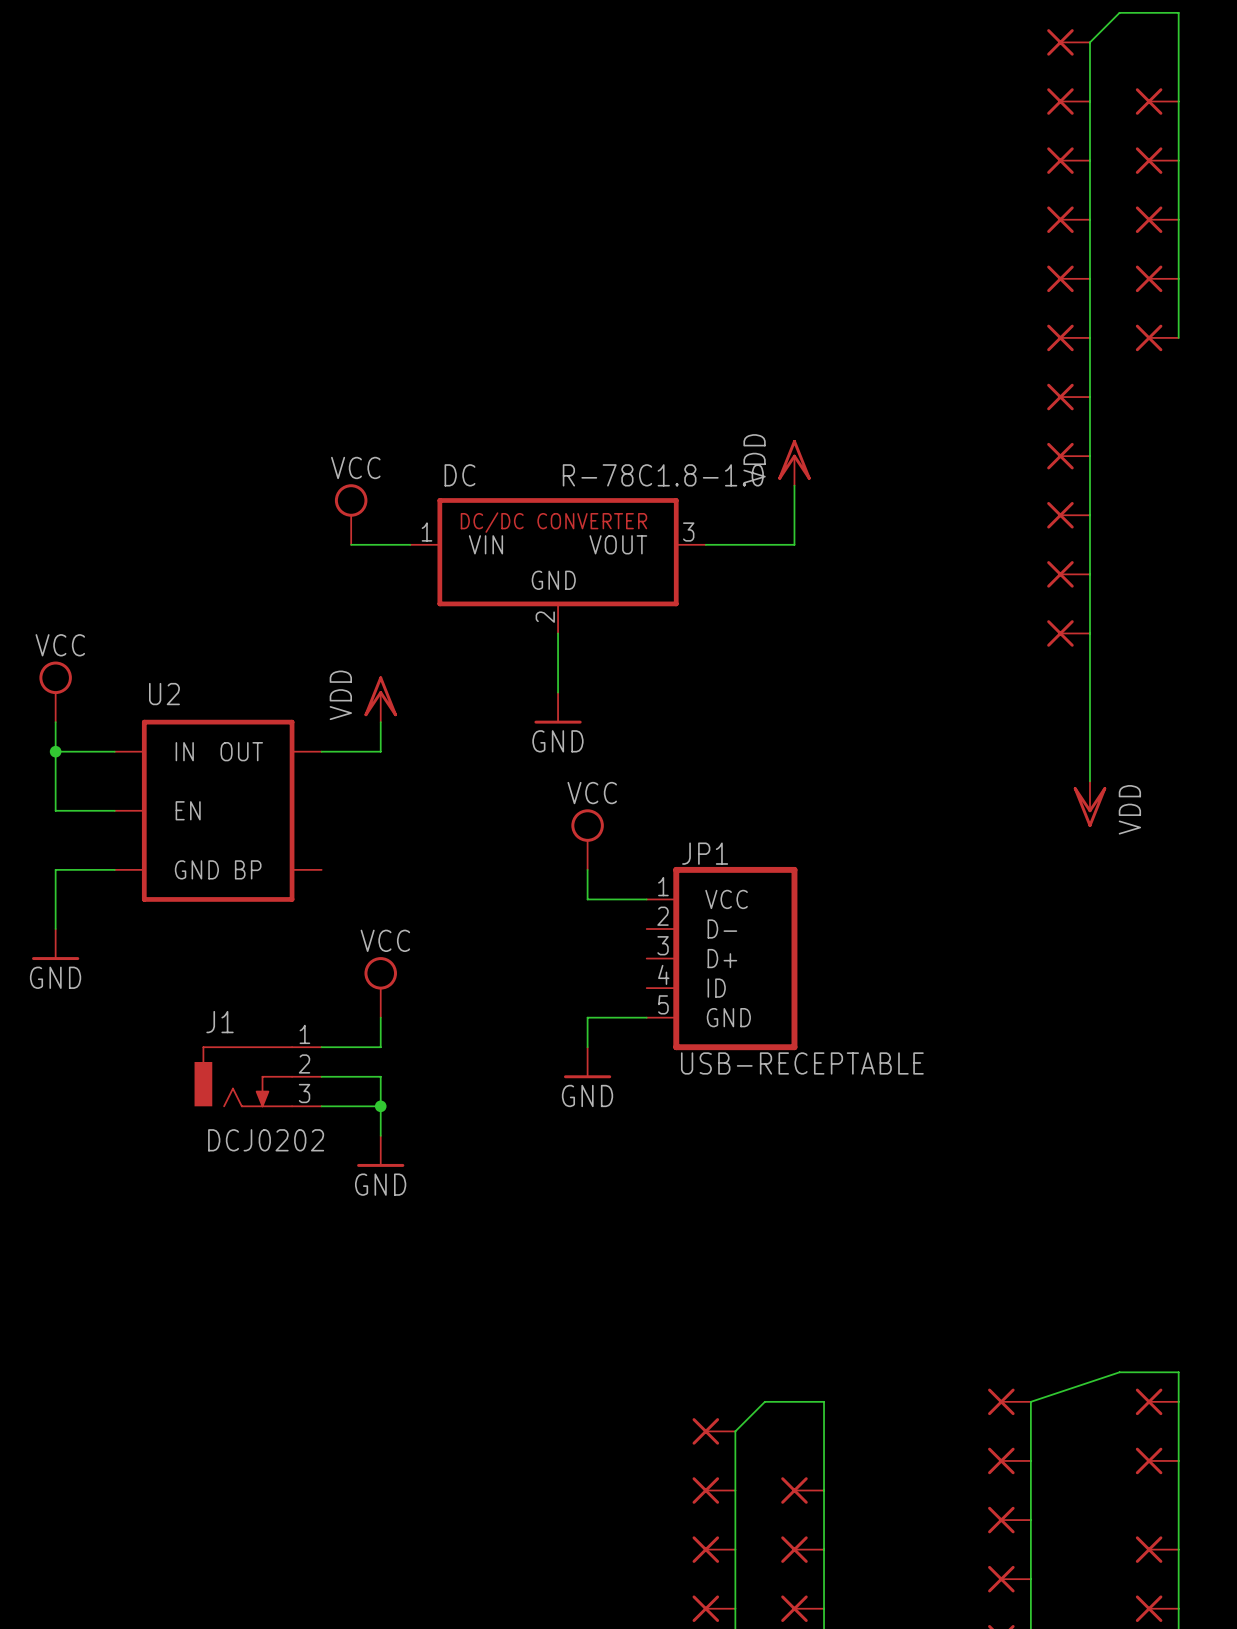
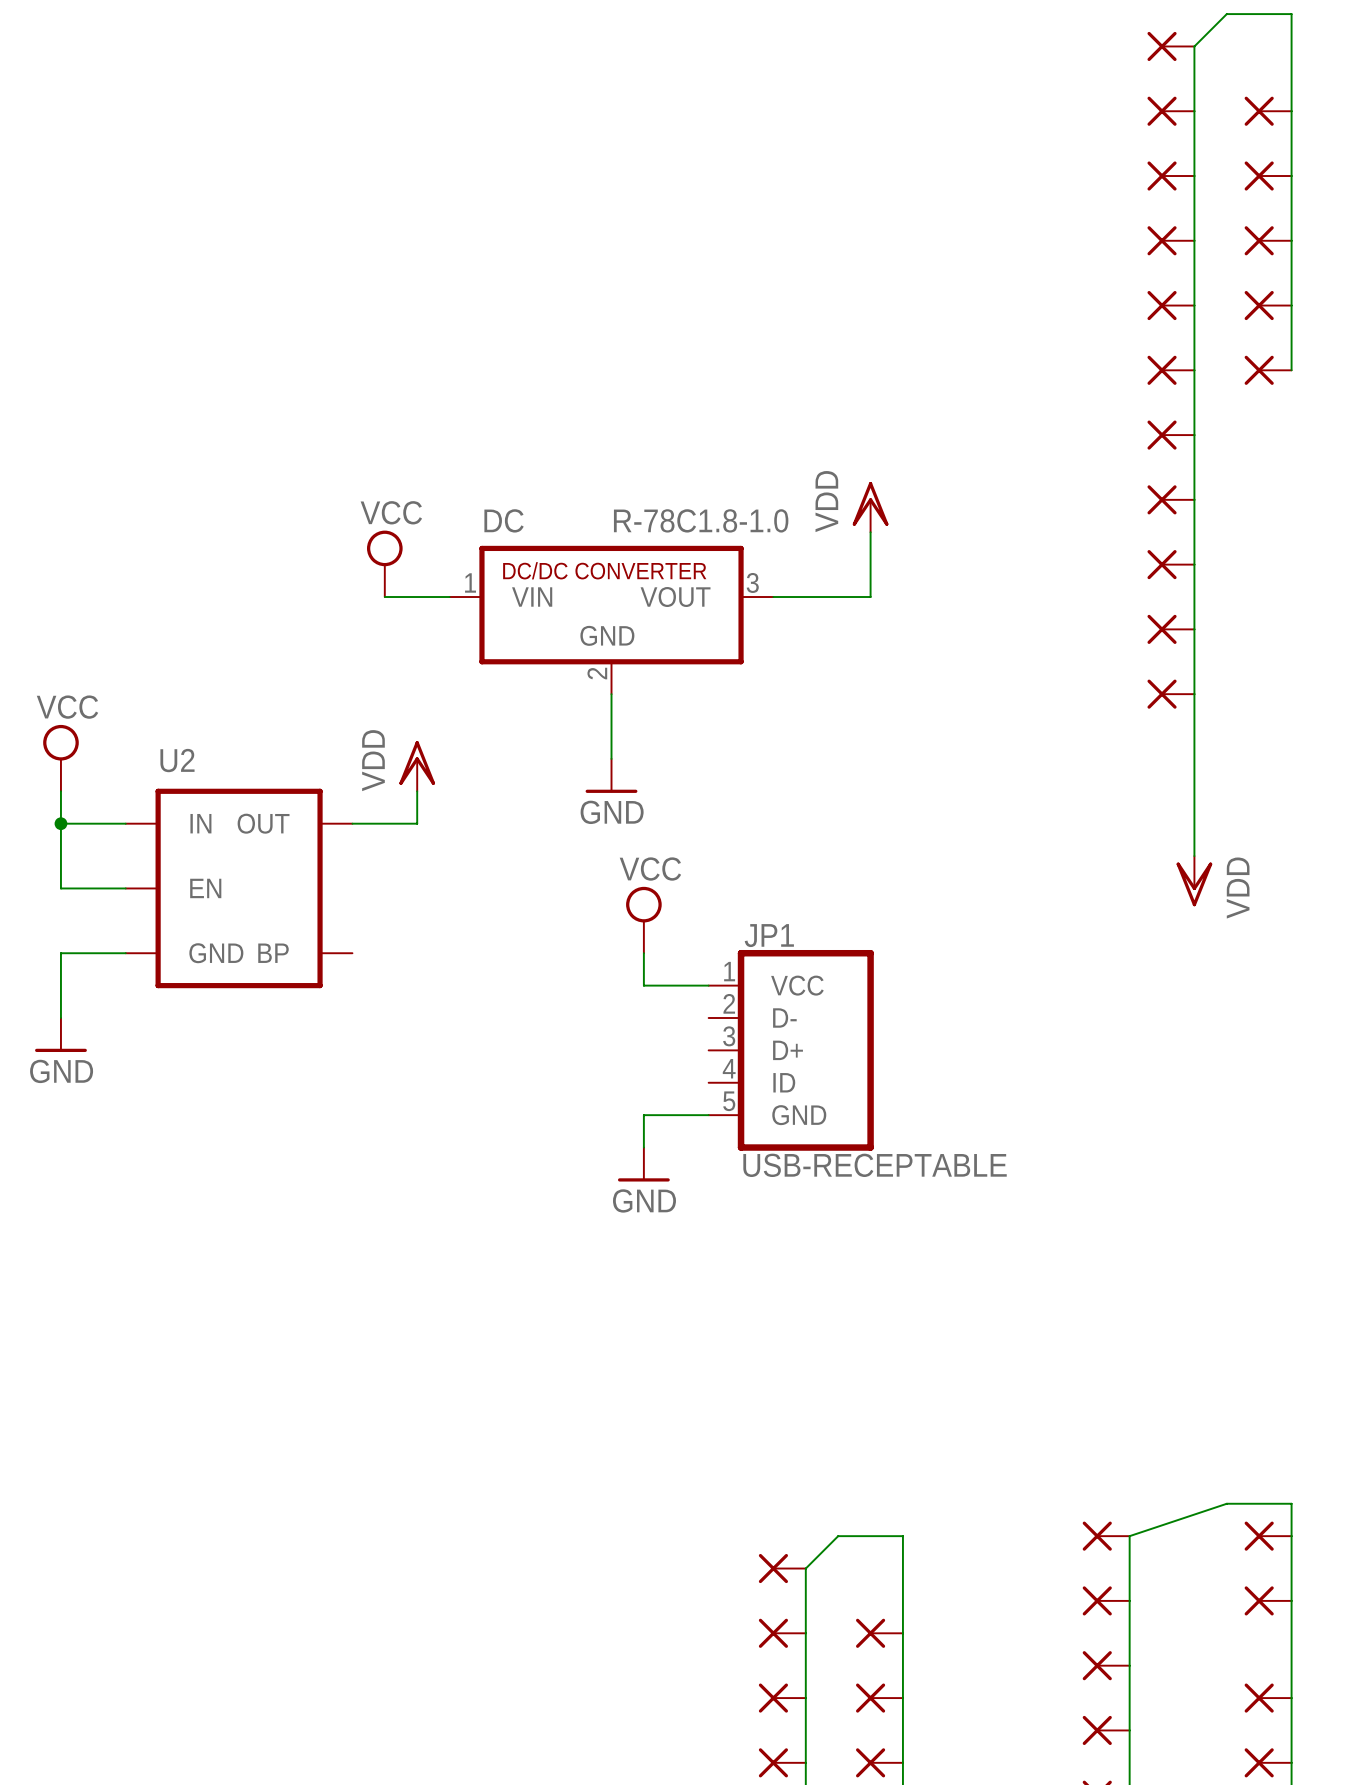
power symbol: VCC (380, 987) -> none
wire: (380, 1017) (380, 1047) (321, 1047) -> none
J1: DCJ0202 (258, 1076) -> none
wire: (321, 1076) (380, 1076) (380, 1135) -> none
wire: (321, 1106) (380, 1106) -> none
junction: (380, 1106) -> none
power symbol: GND (380, 1151) -> none

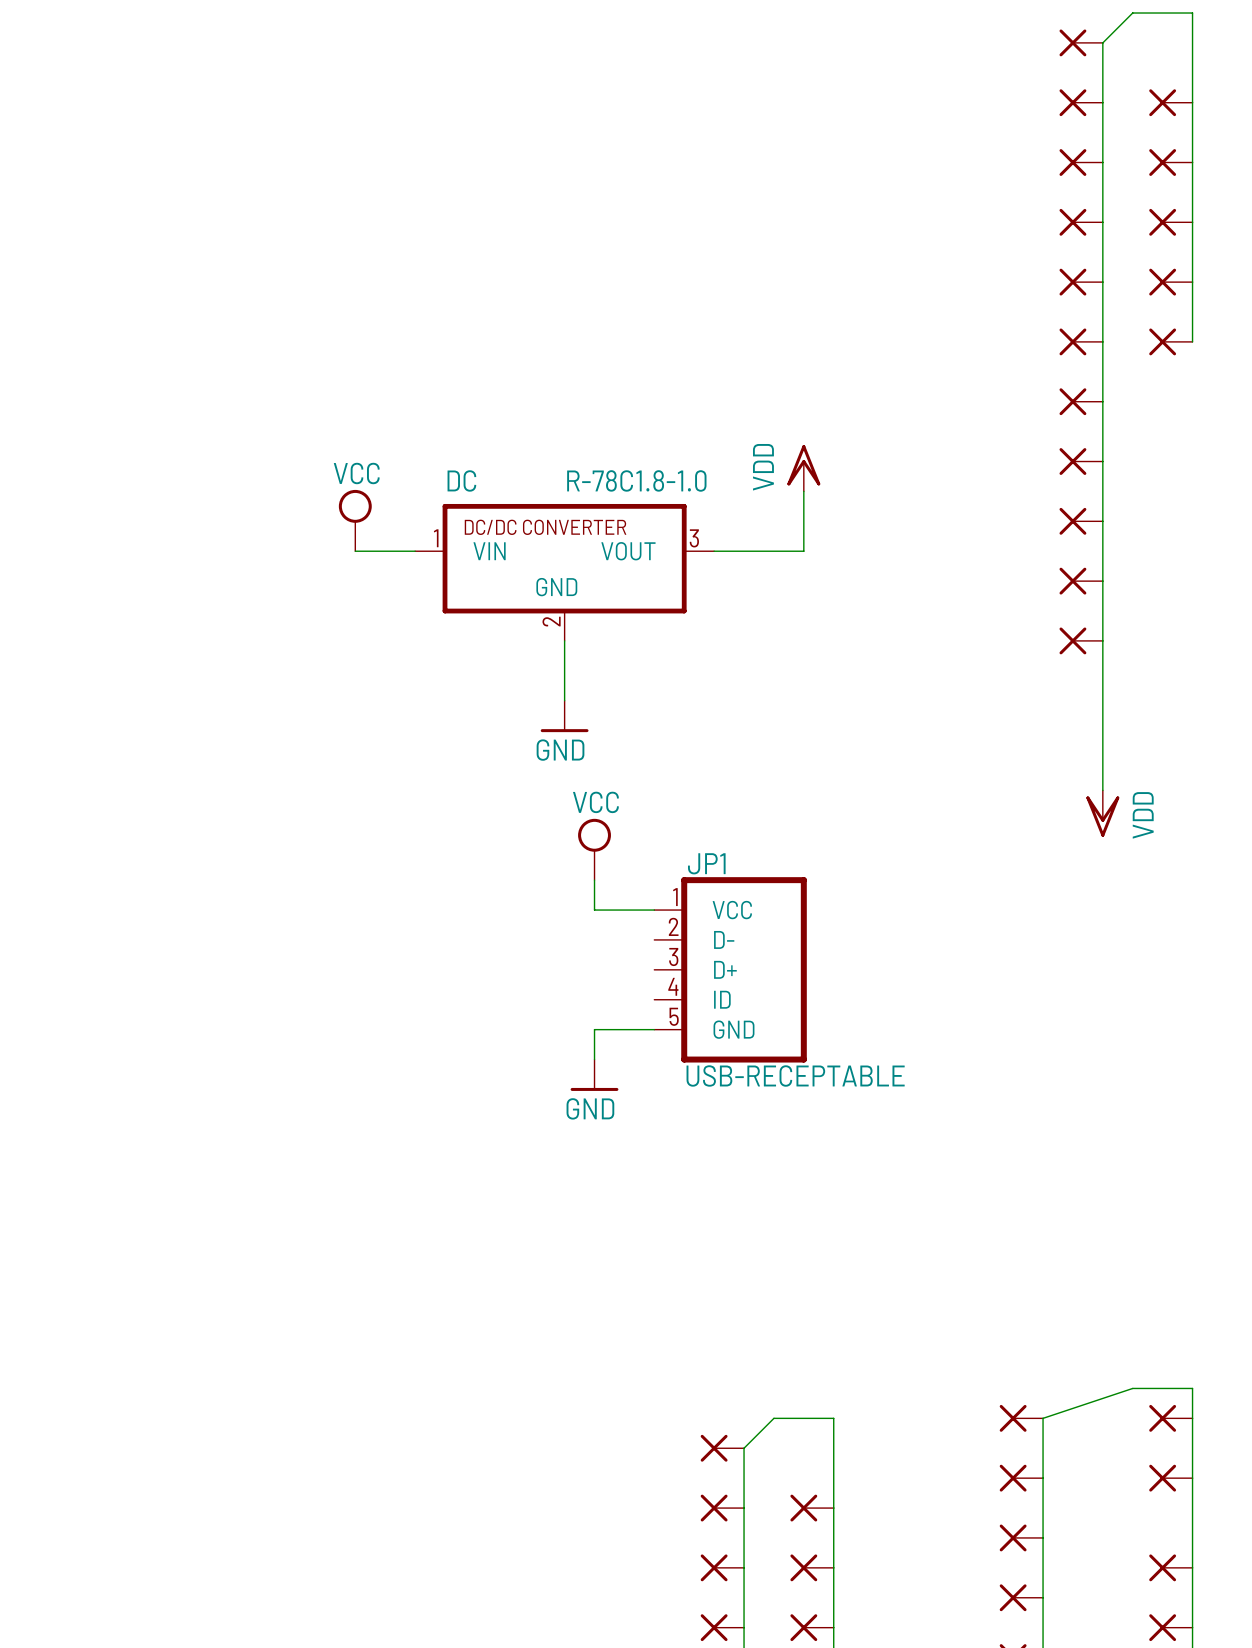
power symbol: VCC (60, 758) -> none
power symbol: VDD (417, 766) -> none
wire: (60, 791) (60, 888) (125, 888) -> none
wire: (417, 791) (417, 823) (352, 823) -> none
wire: (60, 823) (125, 823) -> none
junction: (60, 823) -> none
U2: (239, 888) -> none
wire: (125, 953) (60, 953) (60, 1018) -> none
power symbol: GND (60, 1035) -> none

